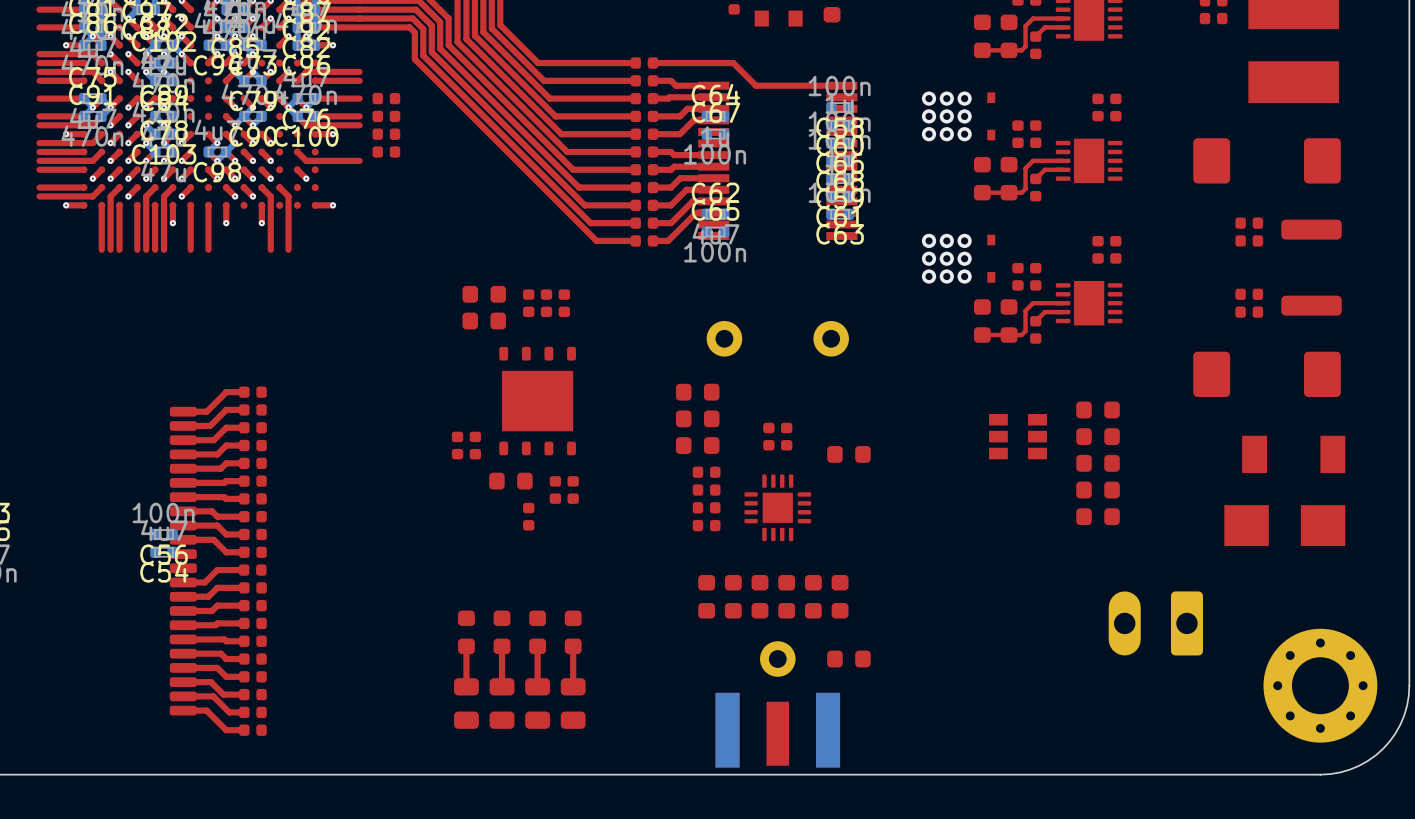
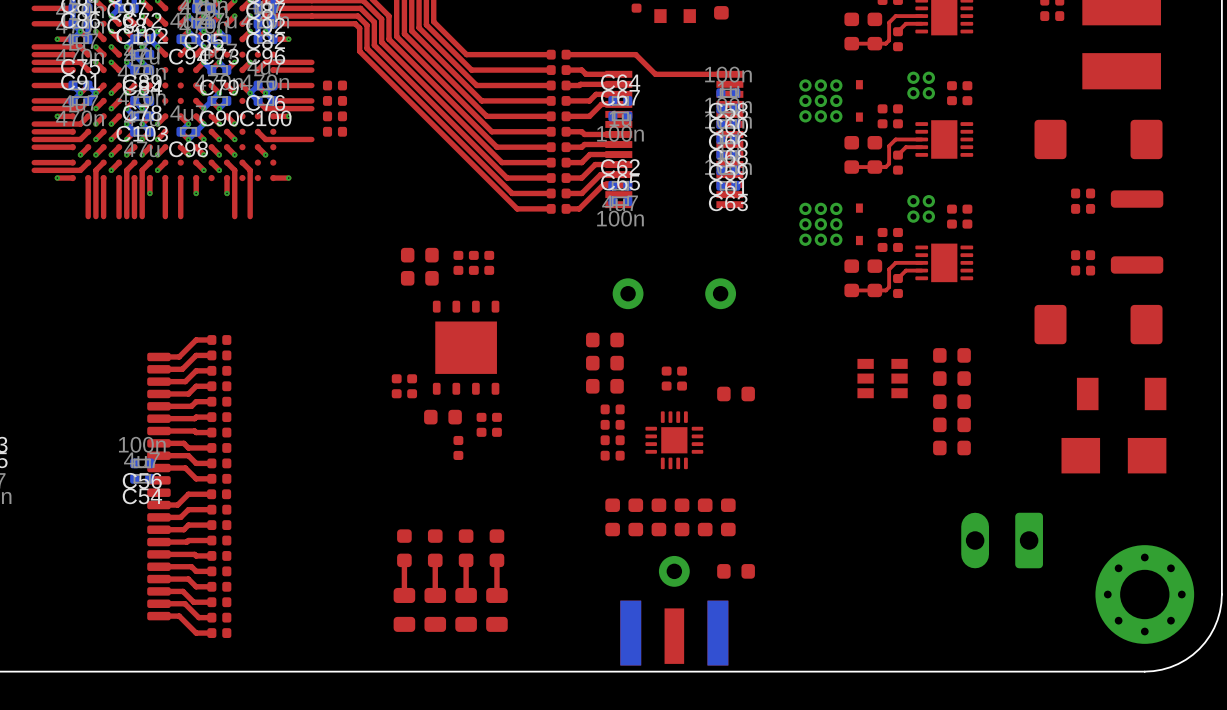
via: none -> (913, 77)
via: none -> (928, 77)
via: none -> (913, 93)
via: none -> (928, 93)
via: none -> (913, 201)
via: none -> (928, 201)
via: none -> (913, 216)
via: none -> (928, 216)

